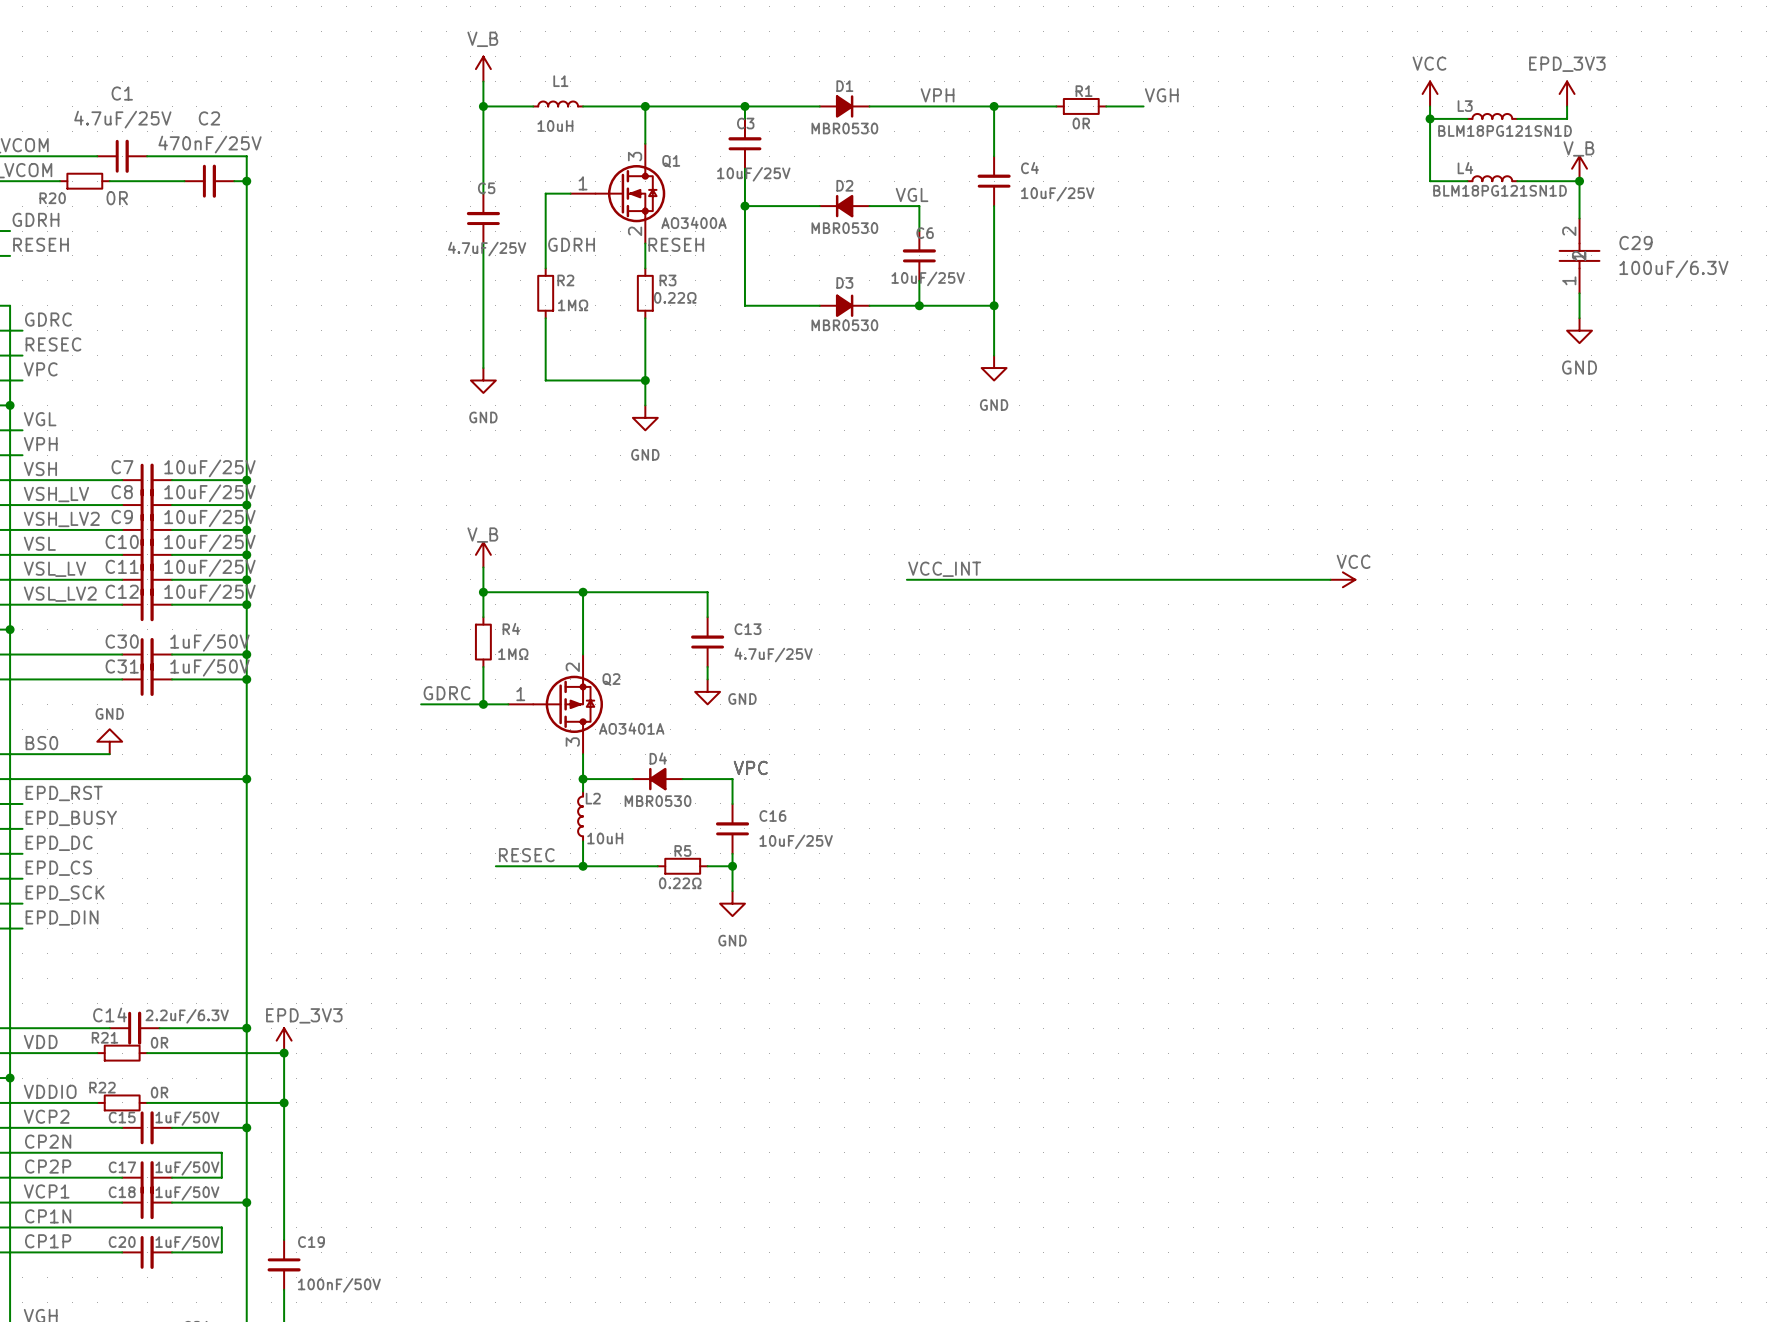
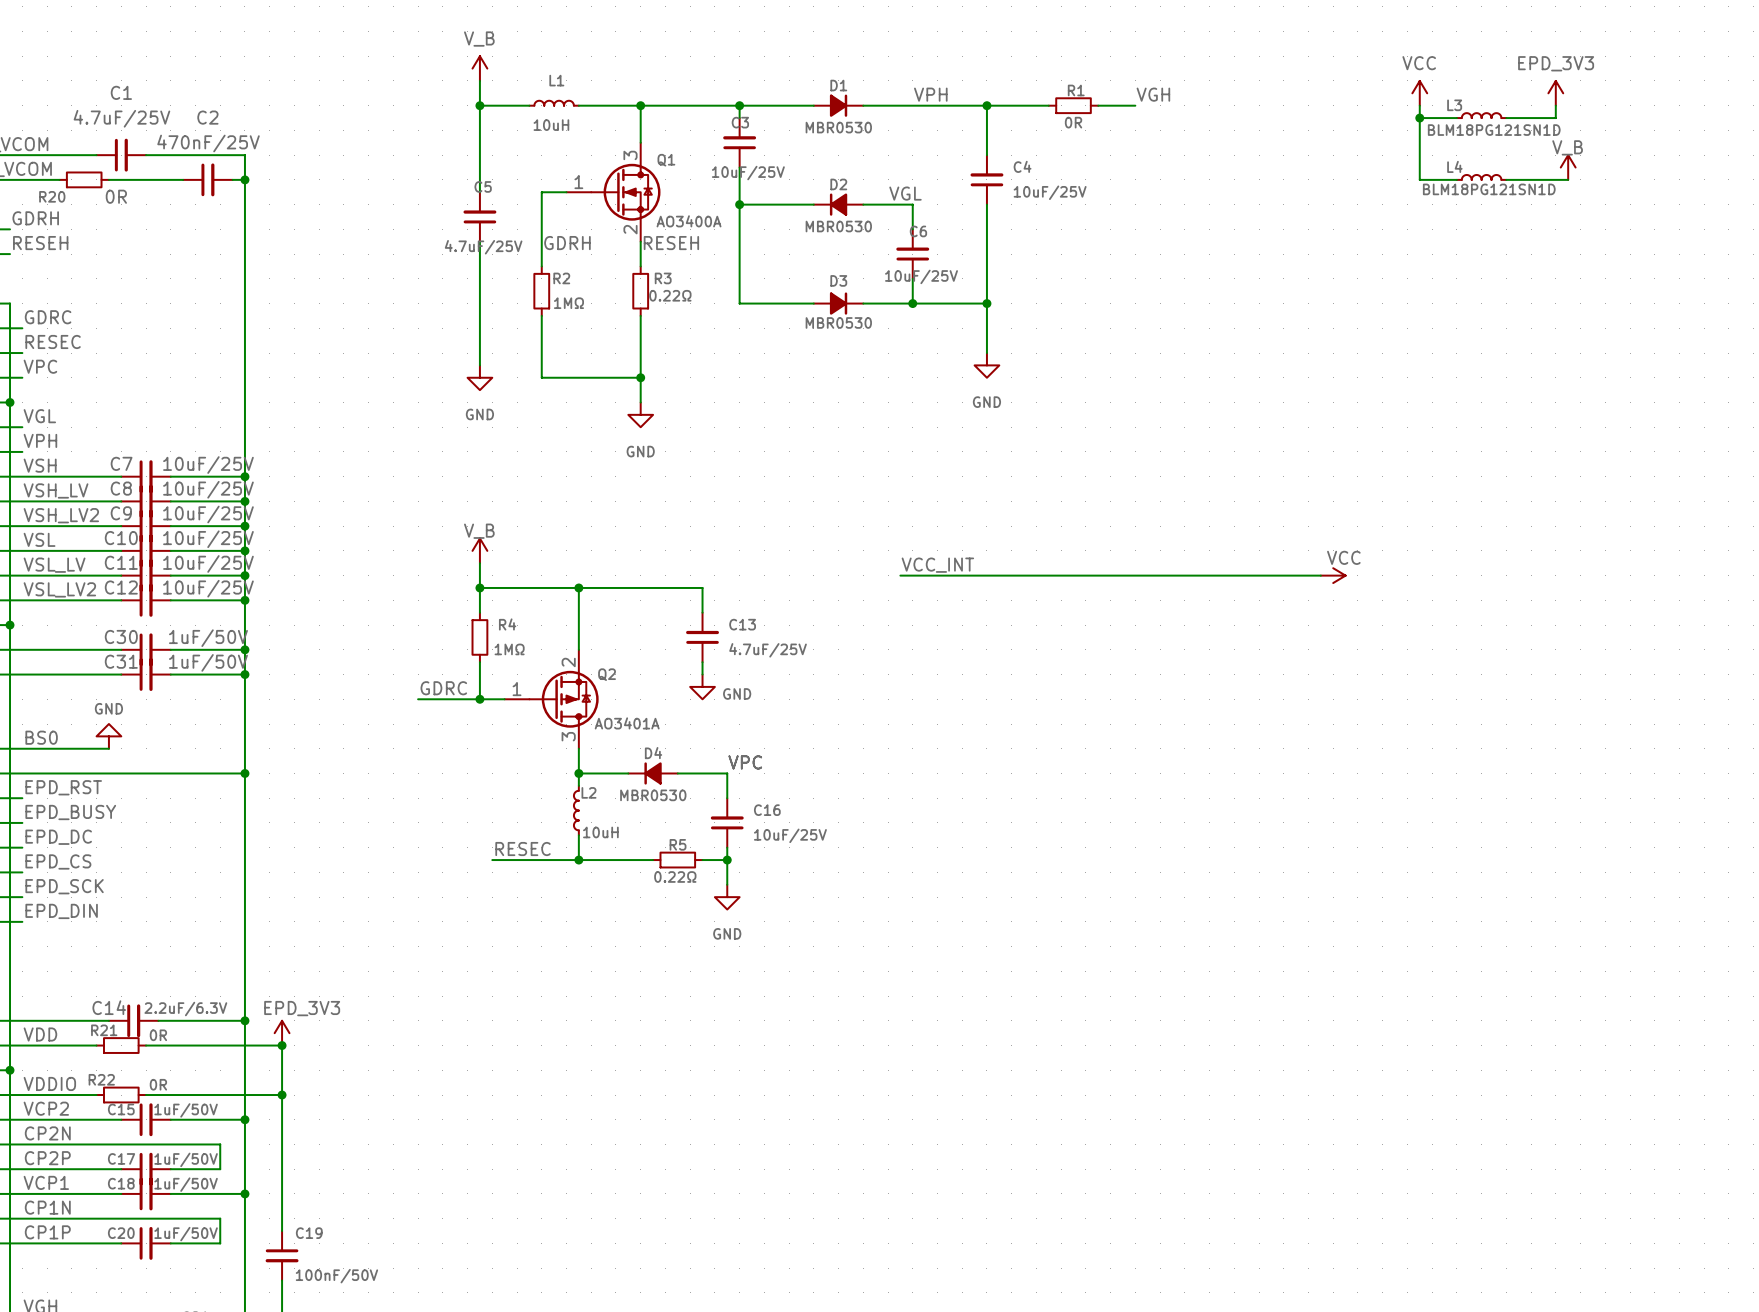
wire: (1579, 181) (1579, 218) -> none
junction: (1579, 181) -> none
C29: 100uF/6.3V (1579, 255) -> none
wire: (1579, 293) (1579, 318) -> none
power symbol: GND (1579, 330) -> none

